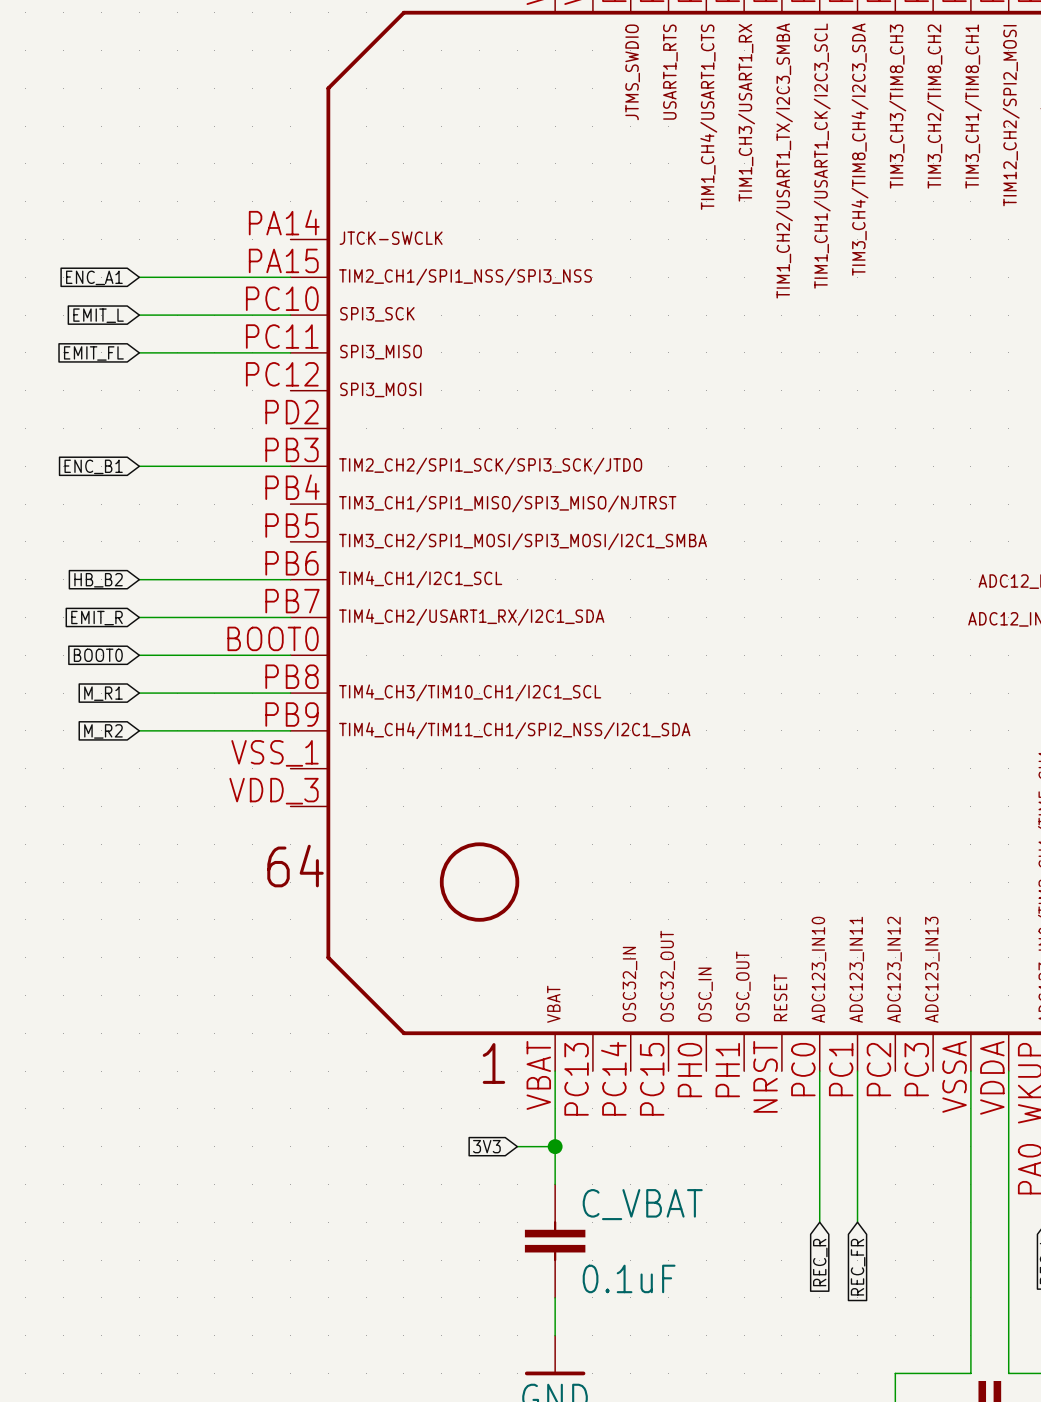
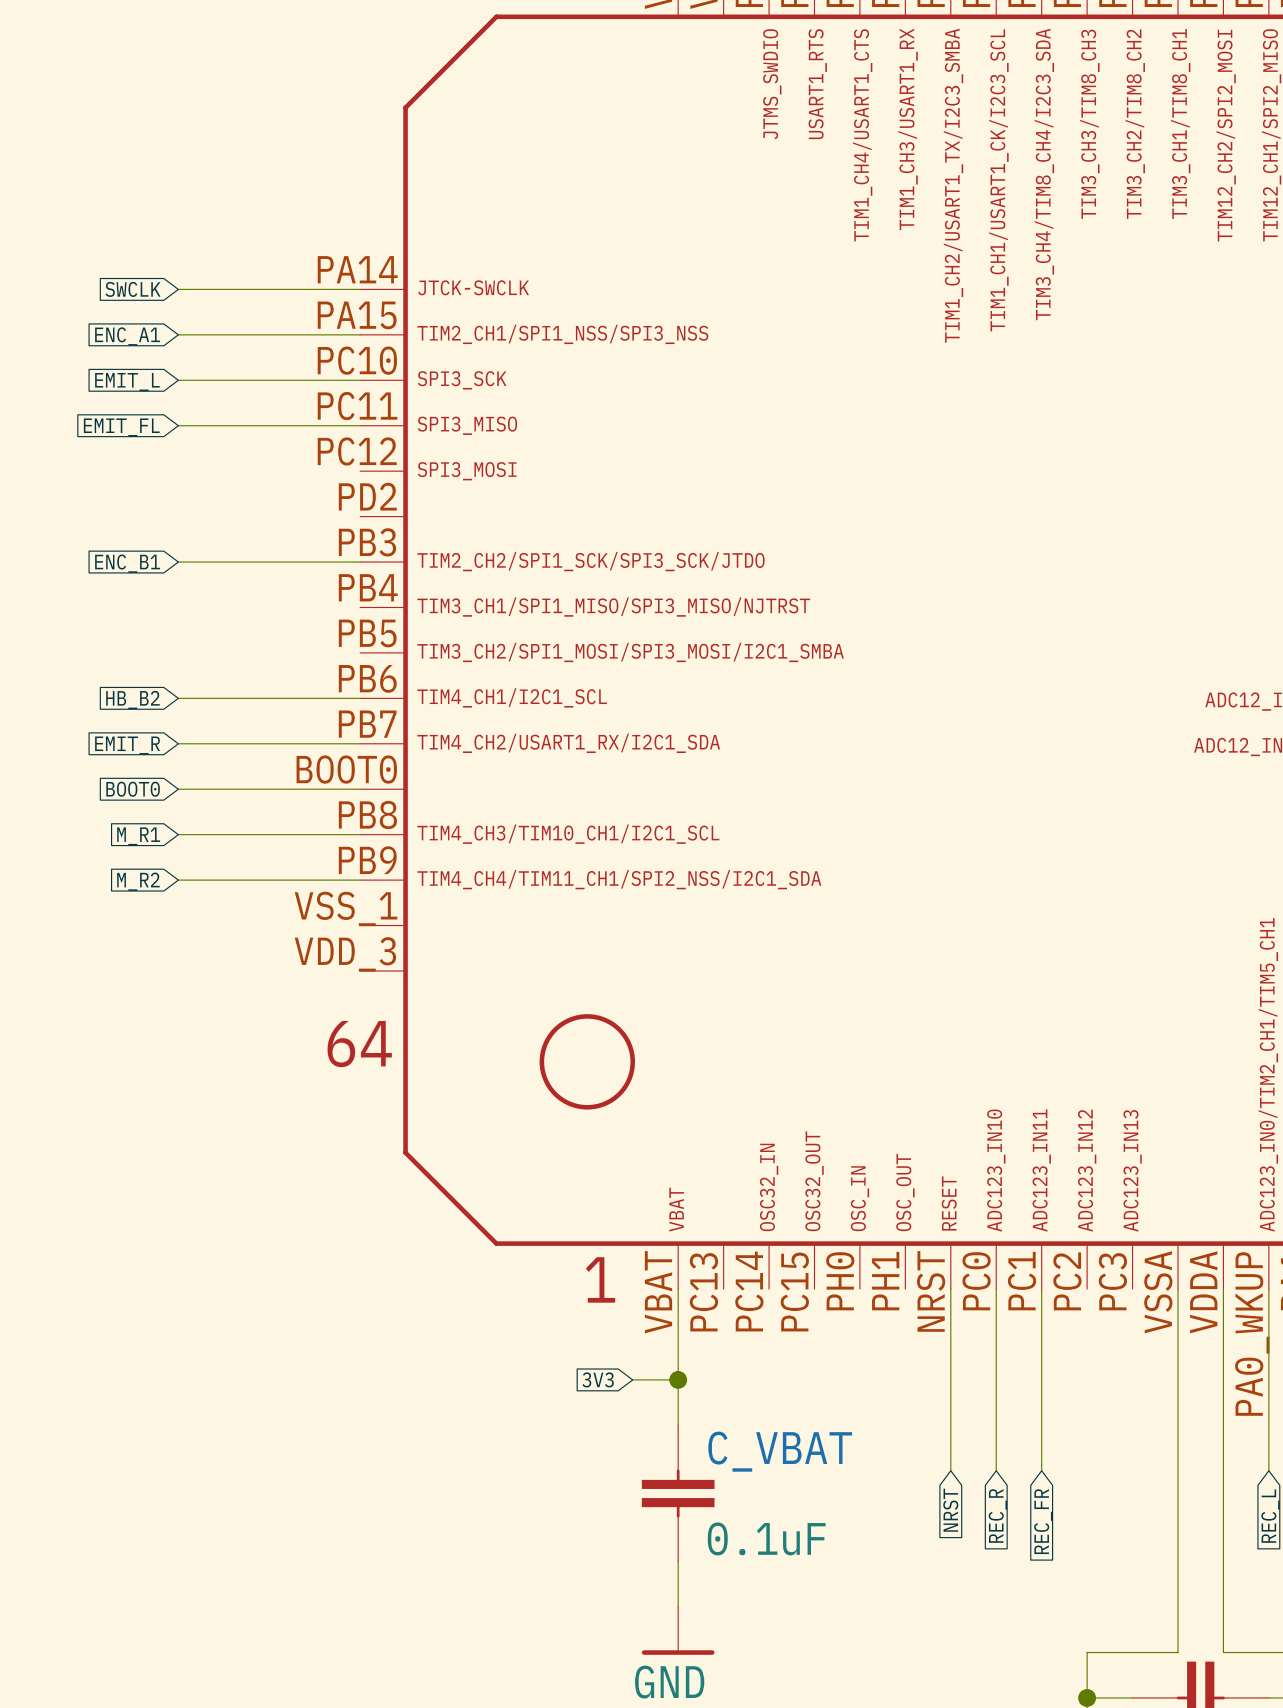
global label: none -> SWCLK (133, 289)
wire: none -> (178, 289) (360, 289)
wire: none -> (950, 1289) (950, 1470)
global label: none -> NRST (950, 1510)

